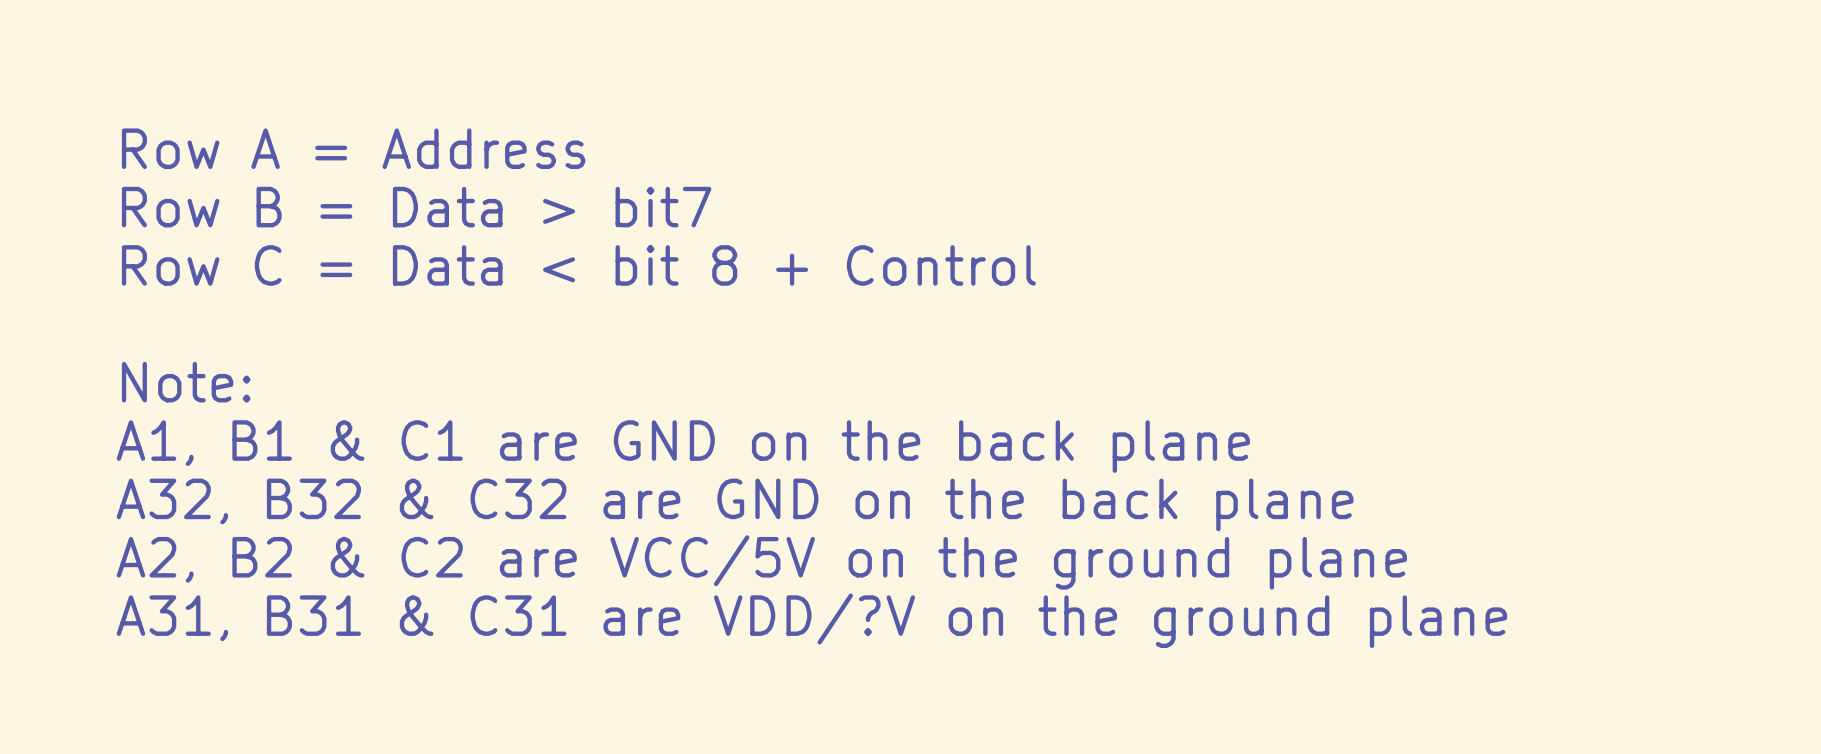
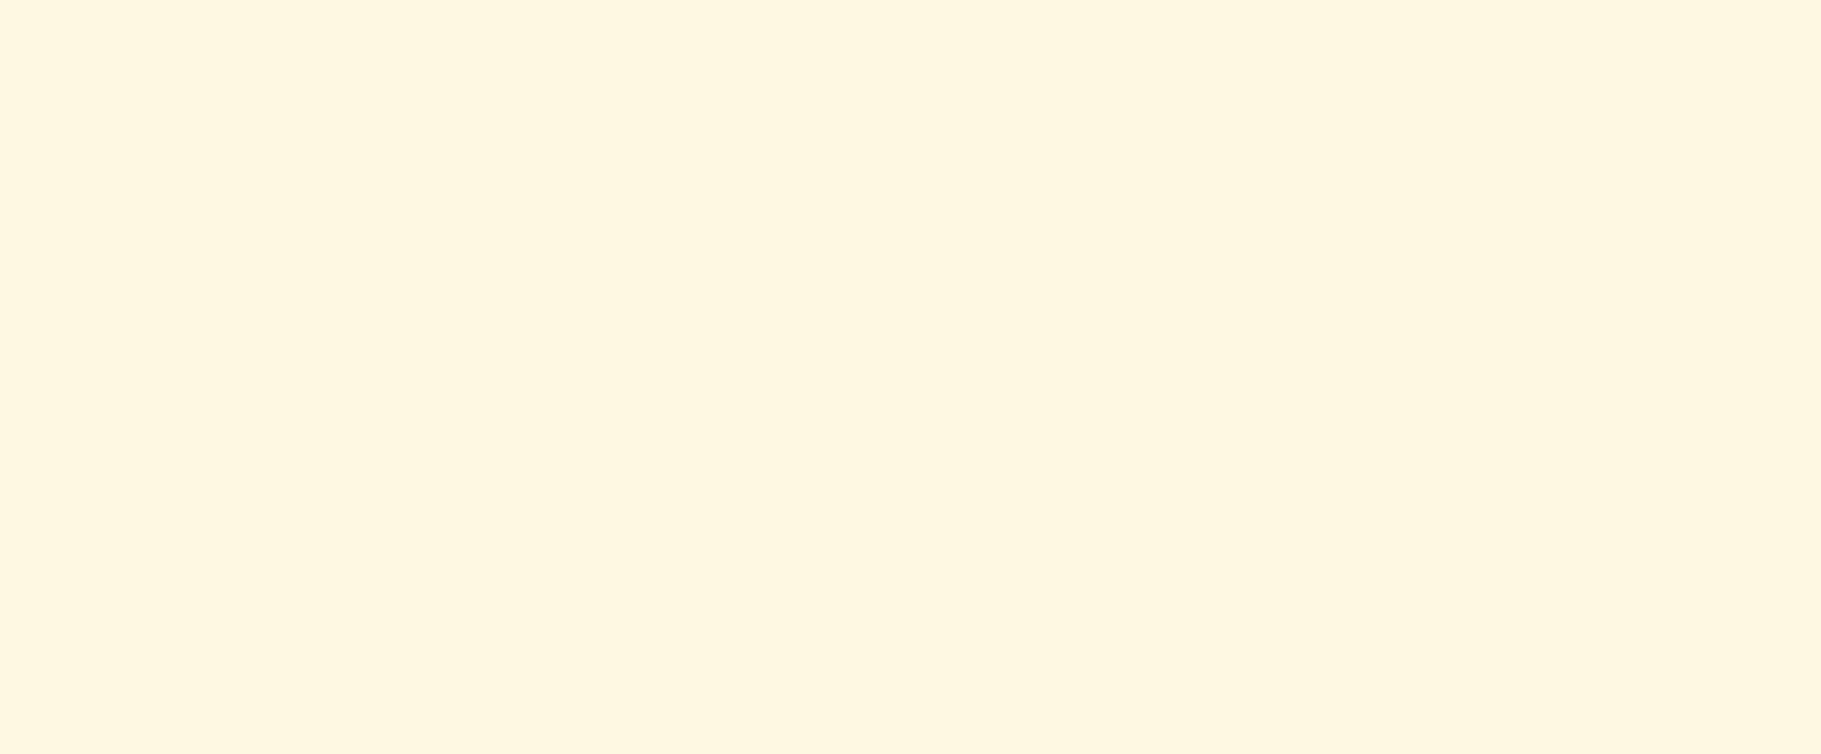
text: Row A = Address (353, 148) -> none
text: Row B = Data > bit7 (416, 207) -> none
text: Row C = Data < bit 8 + Control (578, 265) -> none
text: Note: (186, 382) -> none
text: A1, B1 & C1 are GND on the back plane (683, 446) -> none
text: A32, B32 & C32 are GND on the back plane (735, 504) -> none
text: A2, B2 & C2 are VCC/5V on the ground plane (761, 562) -> none
text: A31, B31 & C31 are VDD/?V on the ground plane (811, 620) -> none

